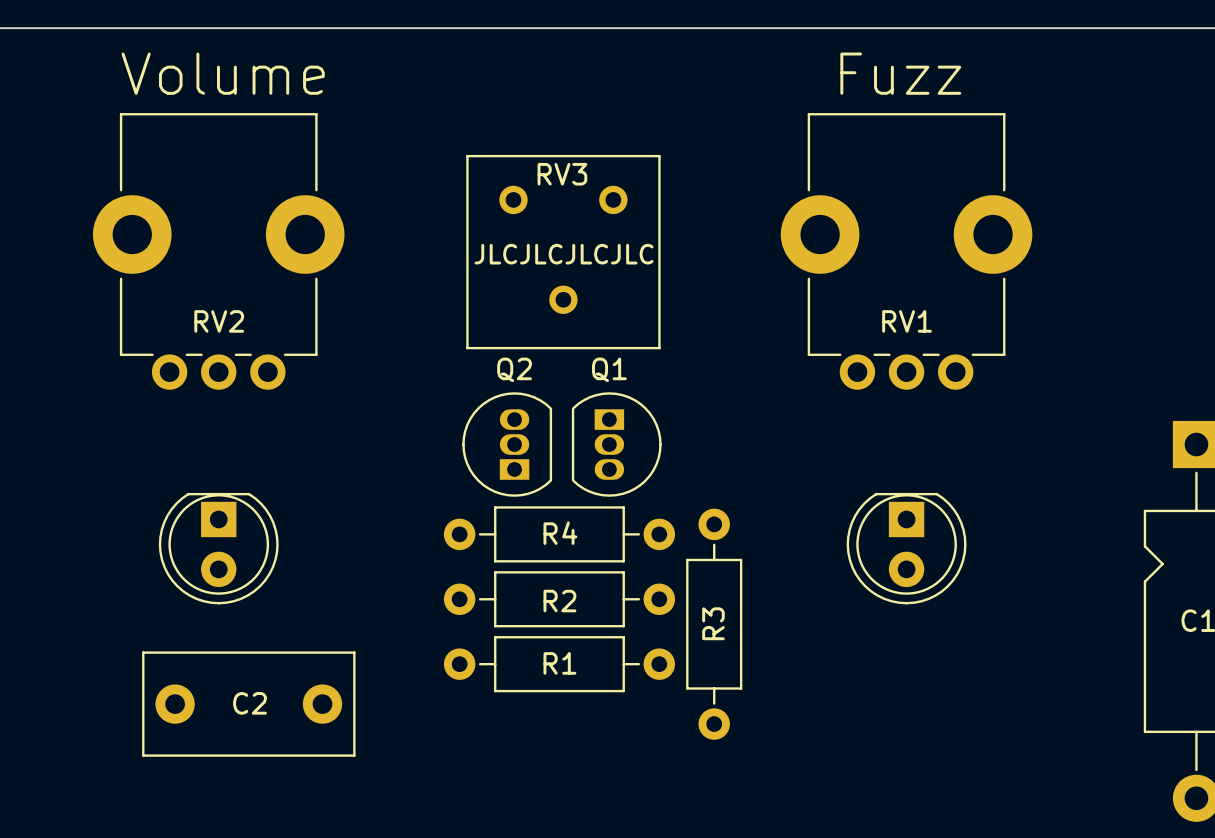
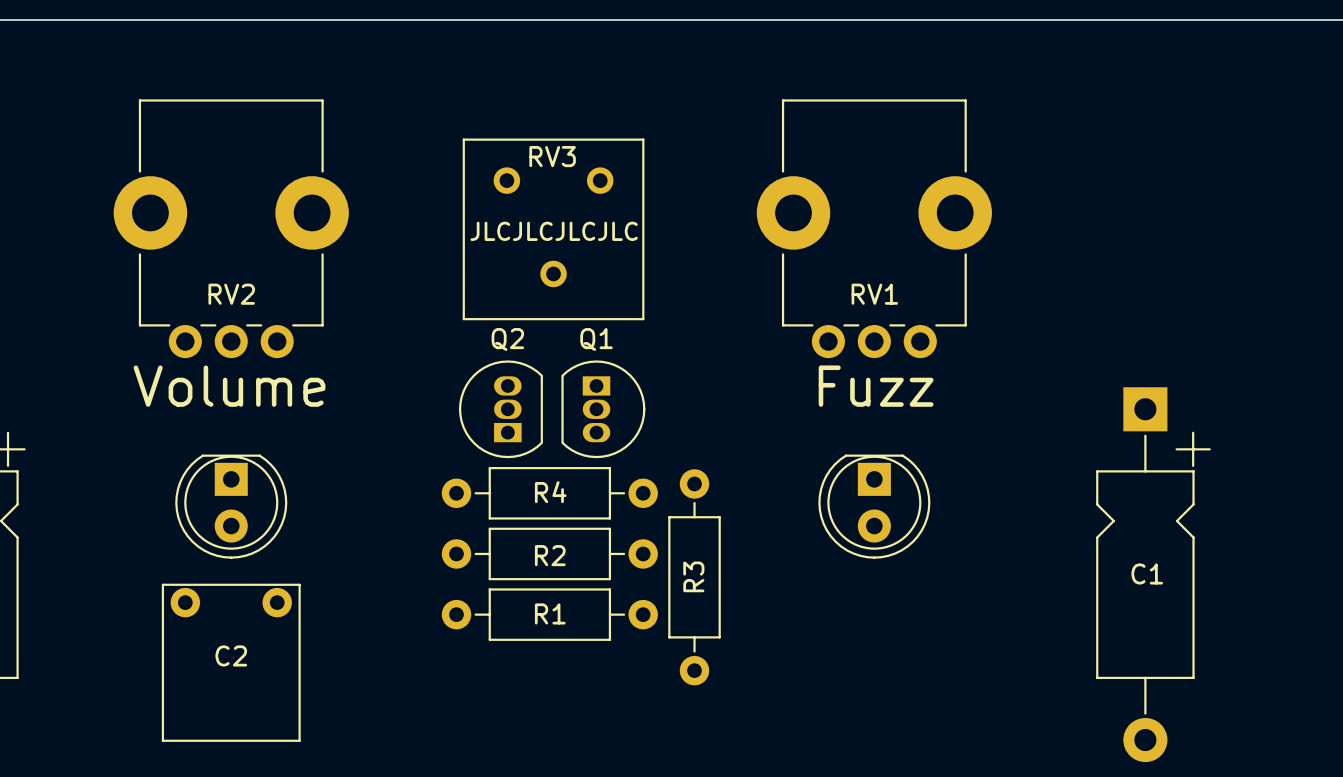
text position: Volume (223, 73) -> Volume (229, 386)
text position: Fuzz (900, 73) -> Fuzz (876, 386)
C2 footprint: [142, 651, 356, 757] -> [161, 583, 301, 742]

